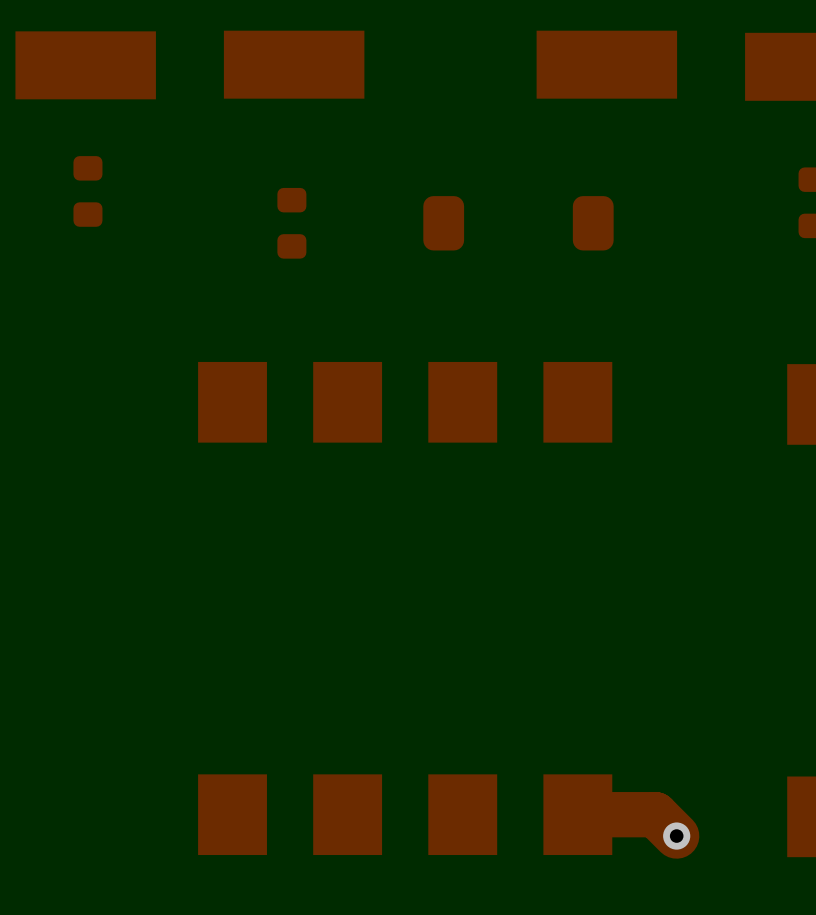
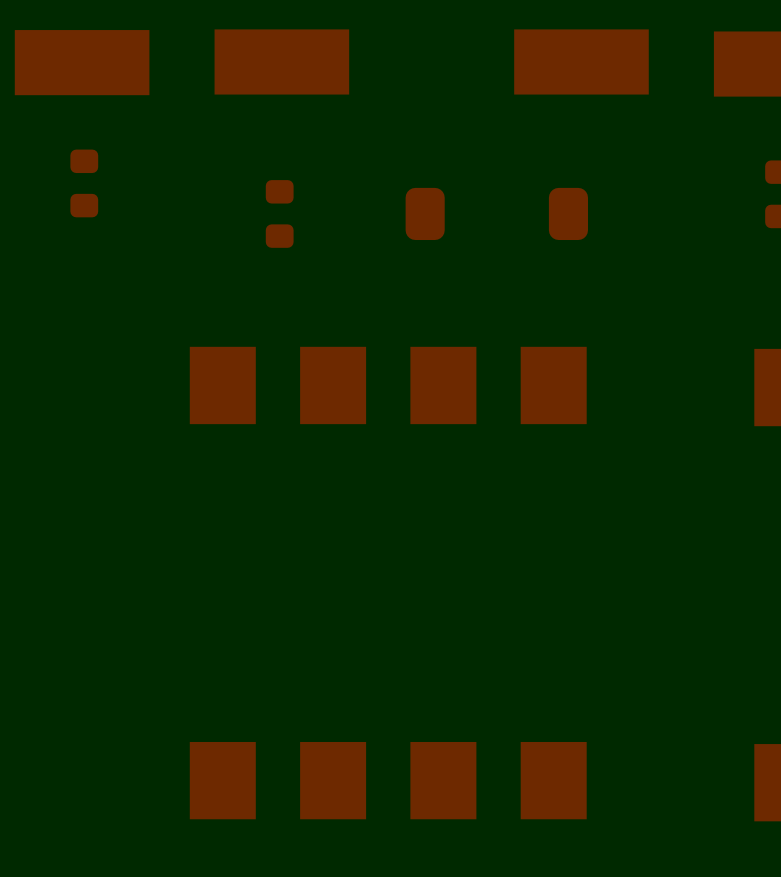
top track: (577, 814) (655, 814) (676, 836) -> none
via: (676, 836) -> none

